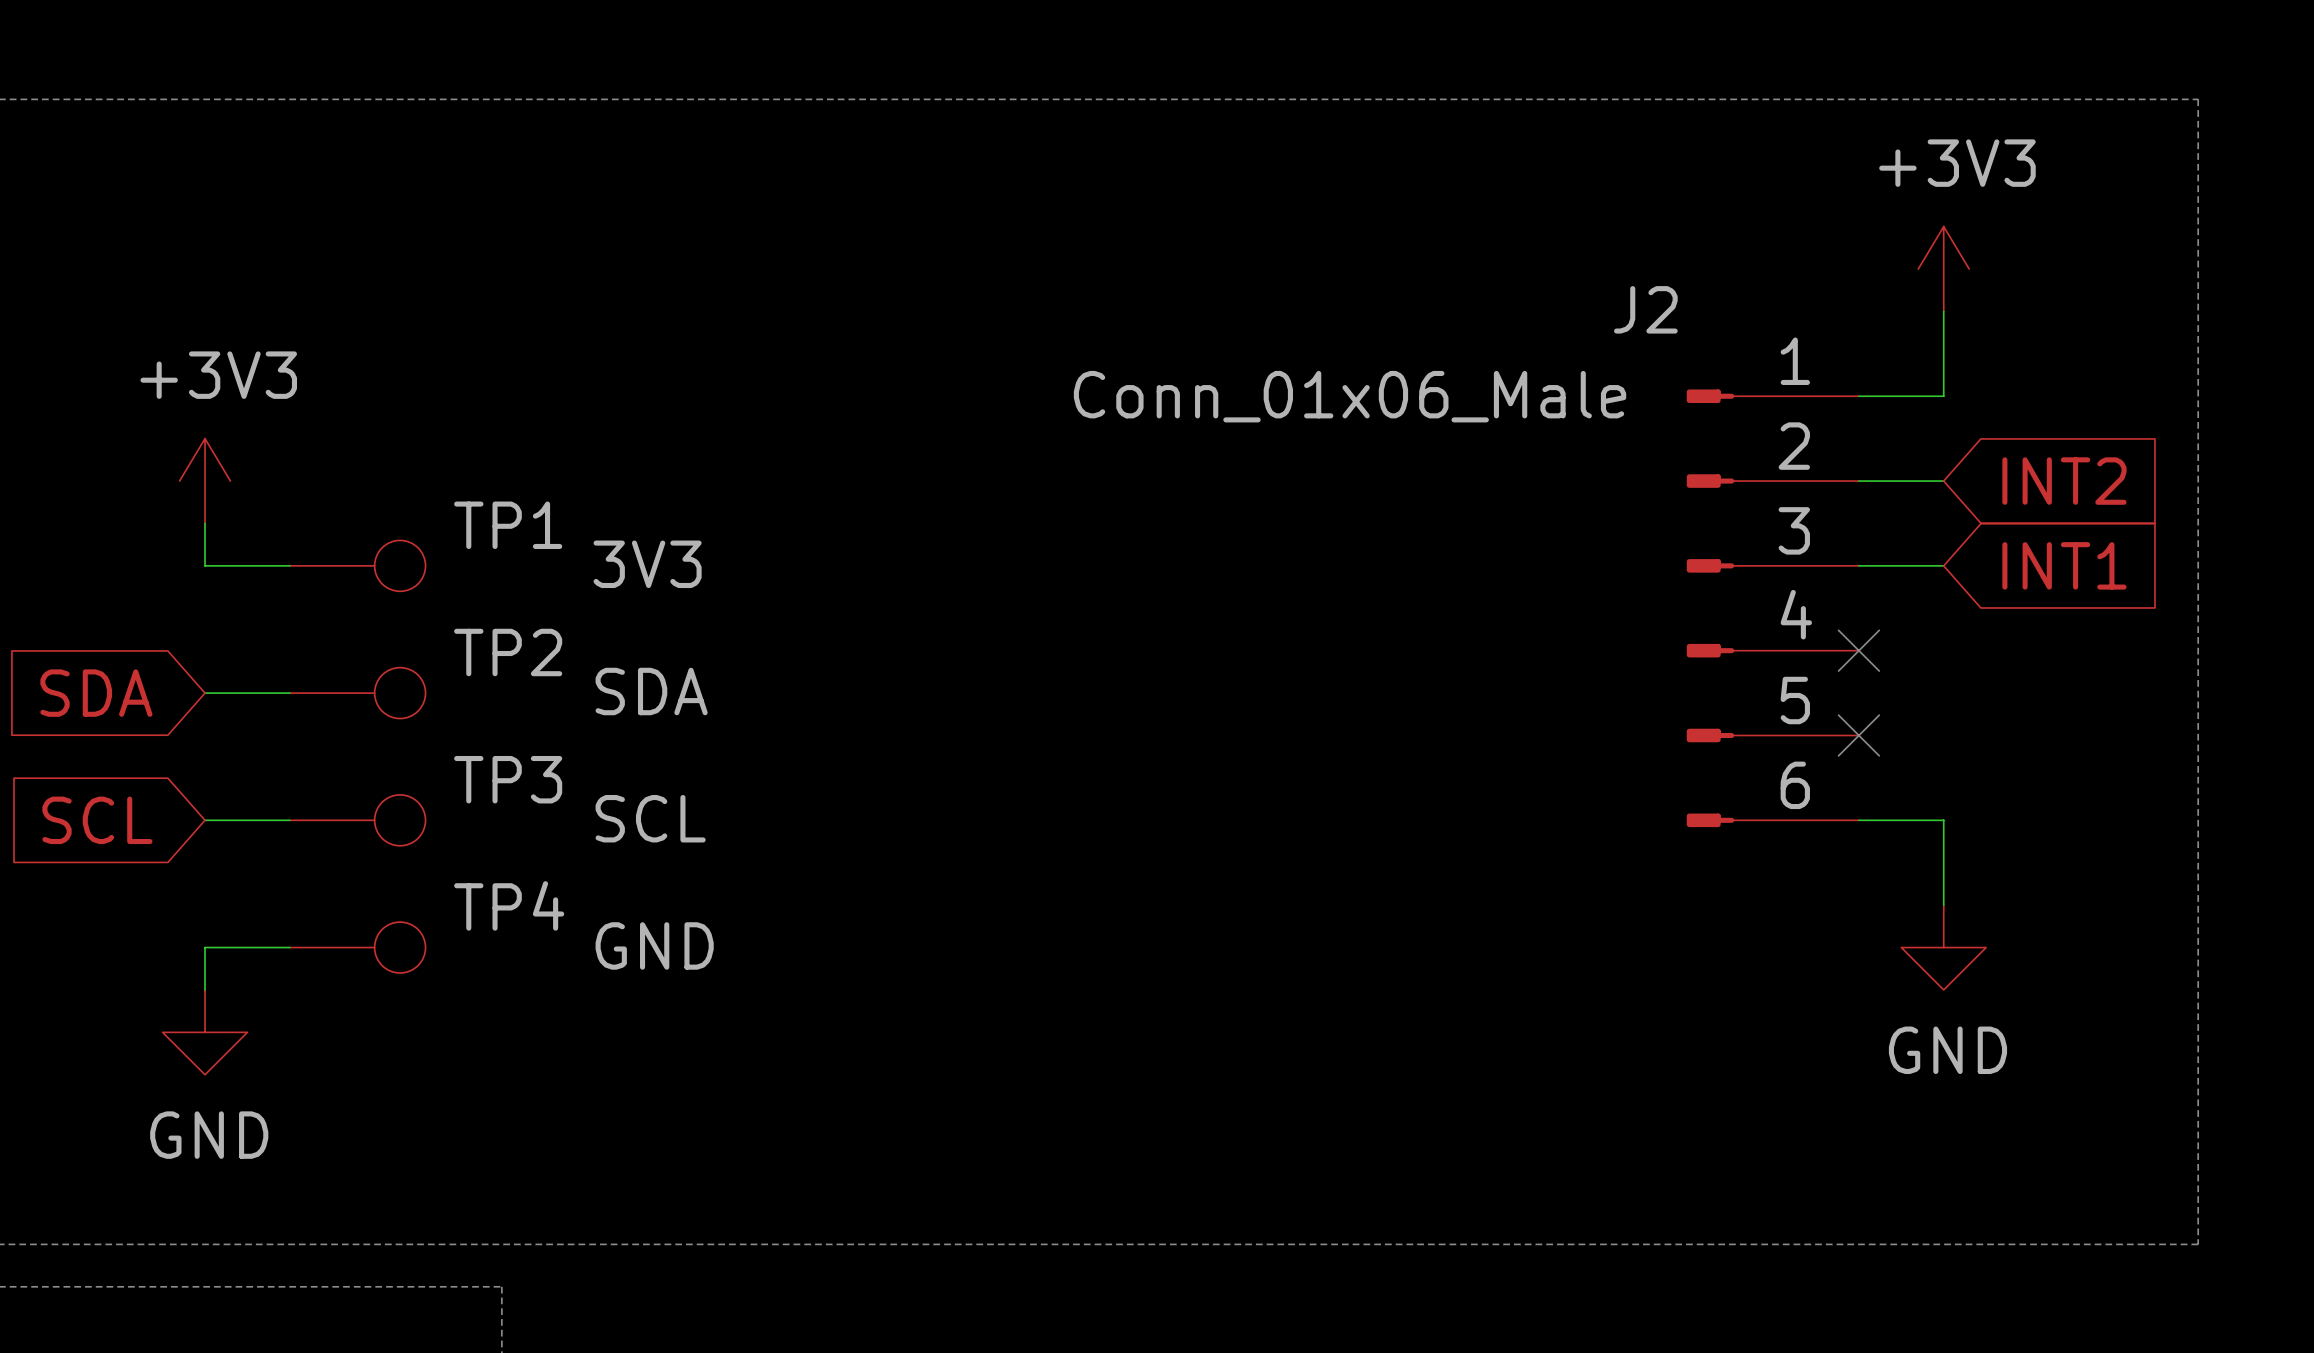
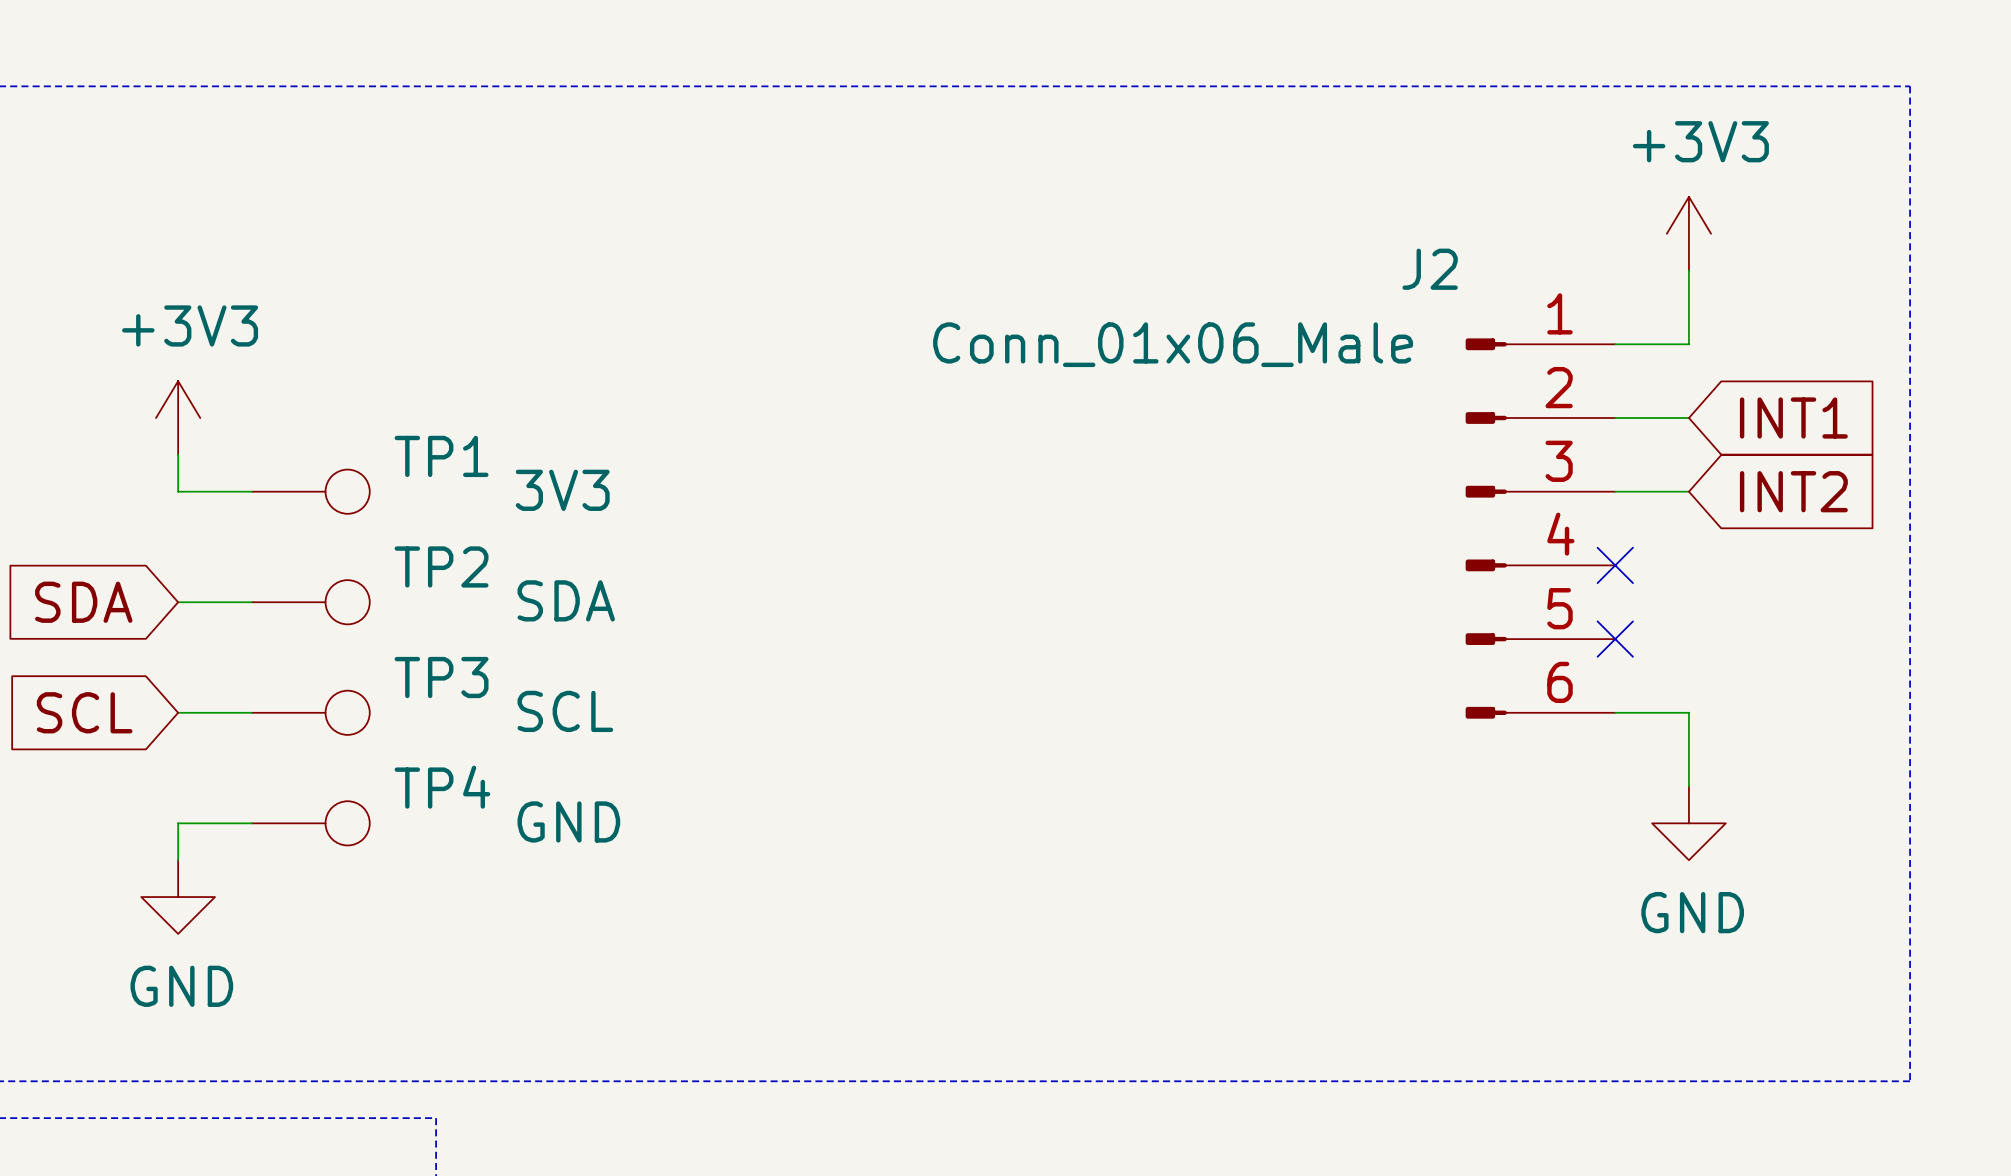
global label: INT2 (2064, 481) -> INT1 (1793, 418)
global label: INT1 (2064, 565) -> INT2 (1793, 491)

